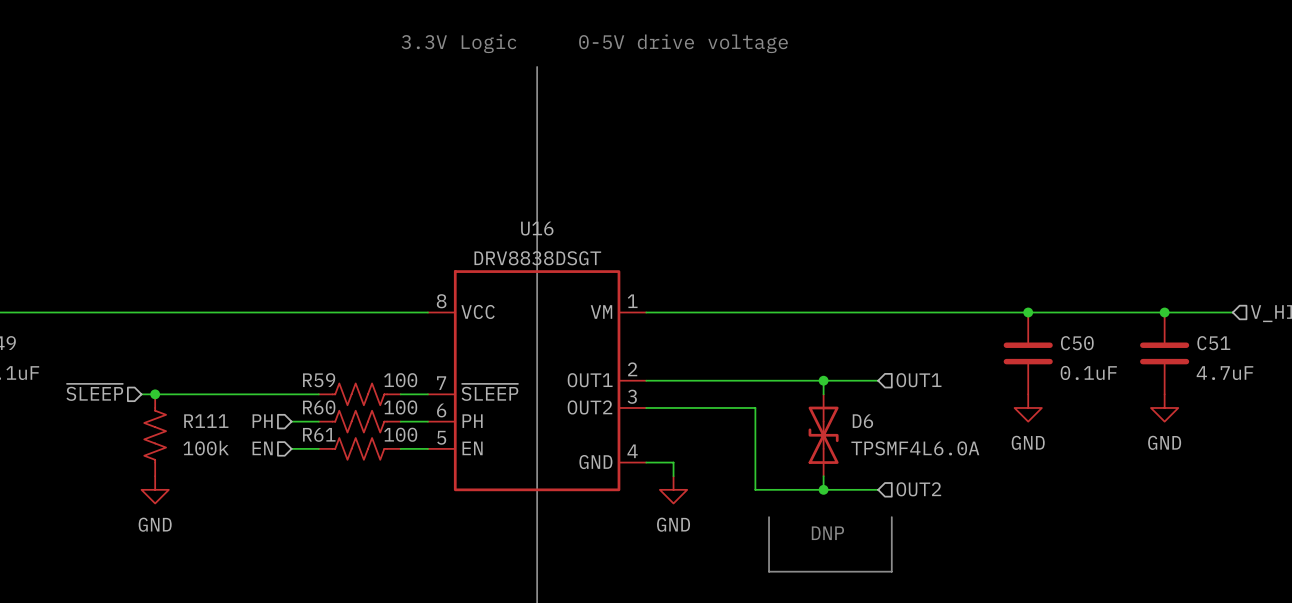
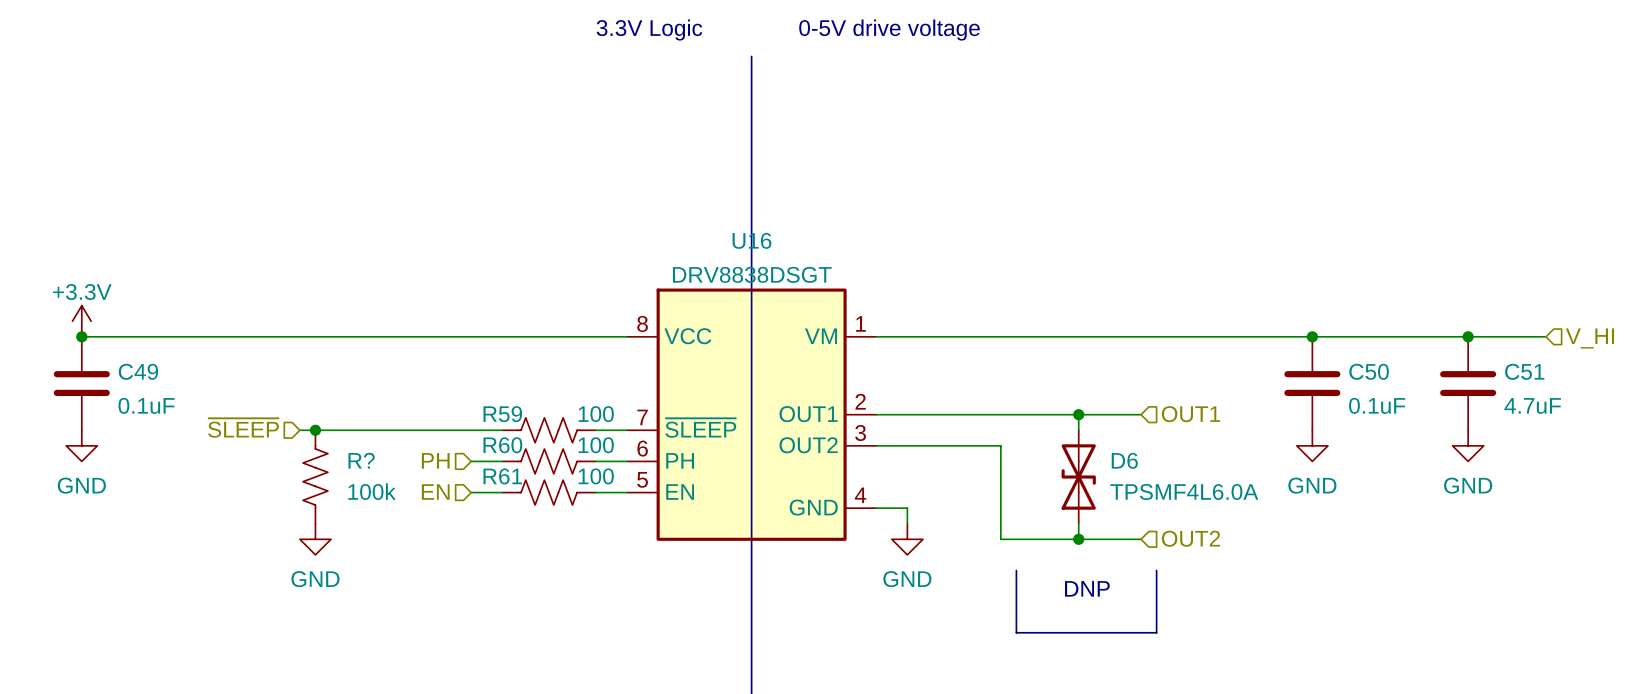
R111 name: R111 (206, 421) -> R? (361, 460)

